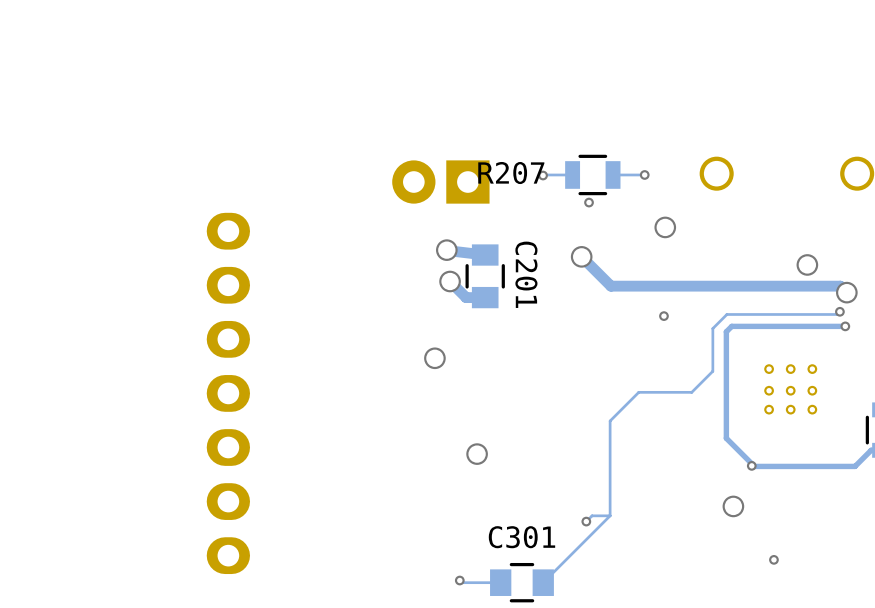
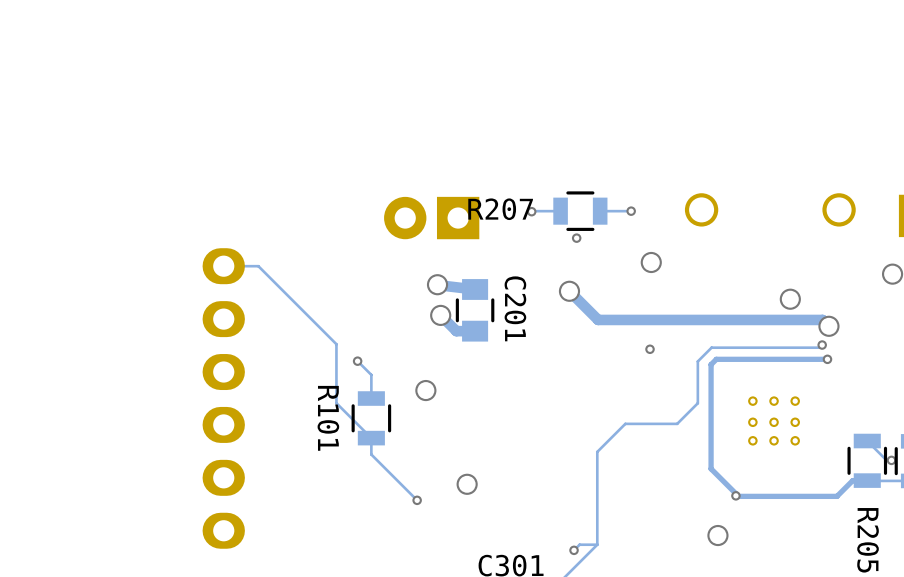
track: none -> (223, 266) (258, 266) (336, 344) (336, 403) (371, 438) (371, 454) (417, 500)
track: none -> (357, 361) (371, 374) (371, 398)
via: none -> (357, 361)
R101: none -> (371, 418)
via: none -> (417, 500)

